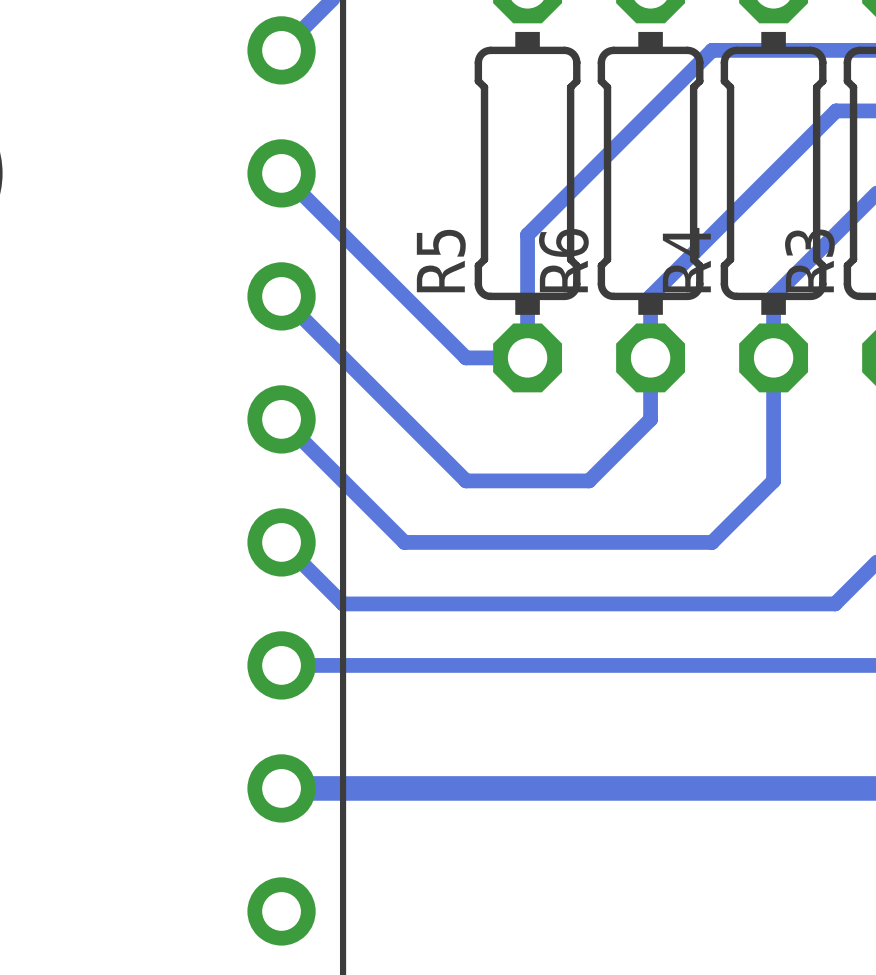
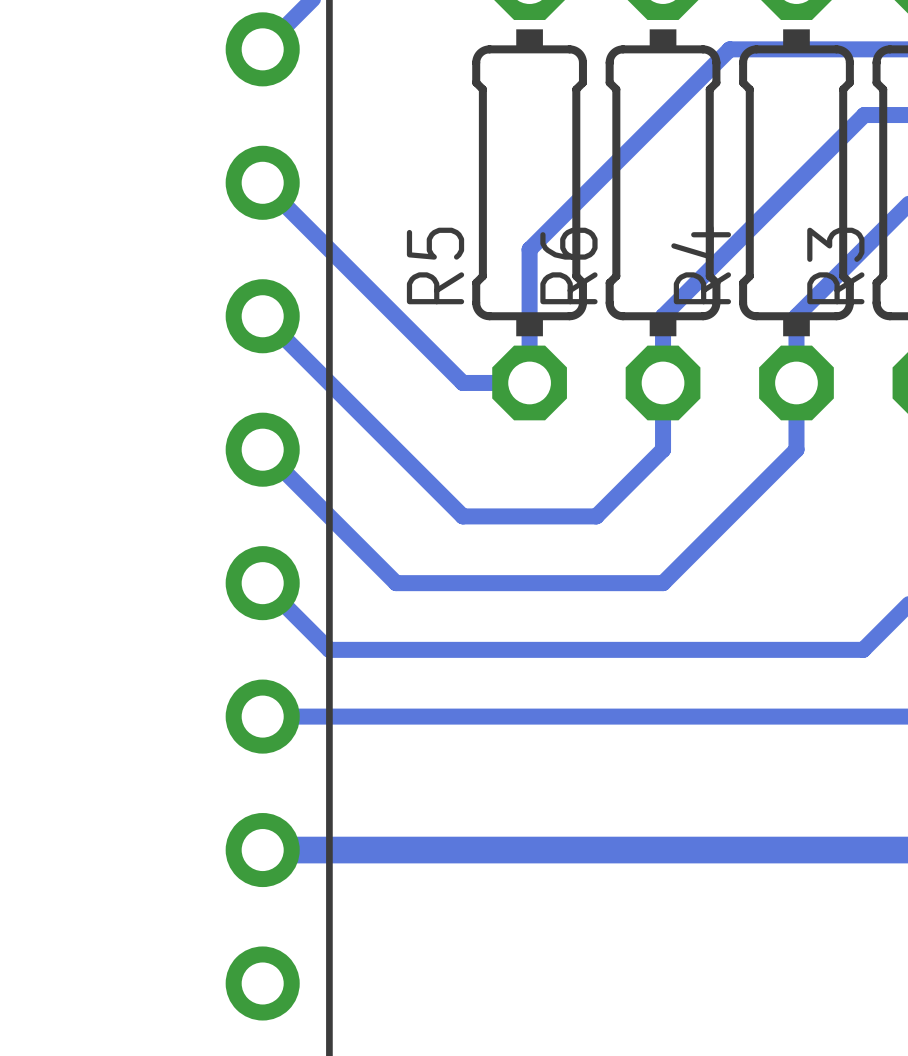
bottom track: (773, 419) (773, 480) (712, 542) (650, 542) -> (796, 449) (663, 583)

